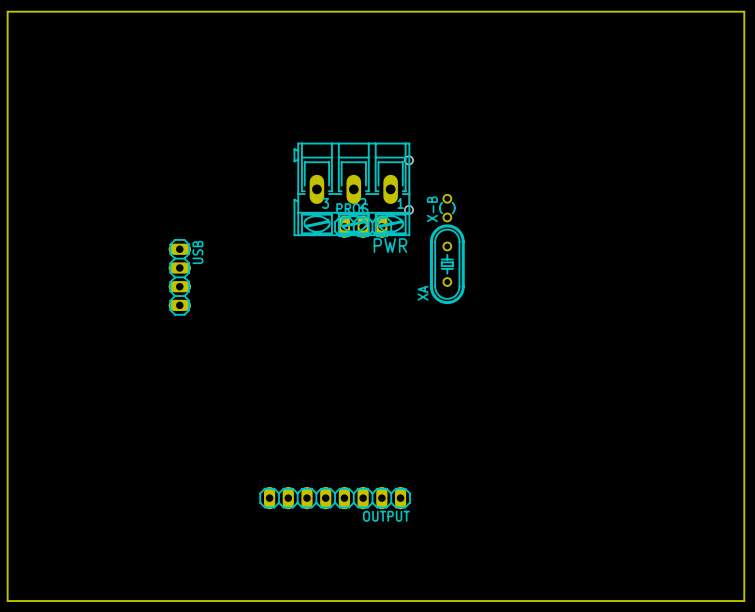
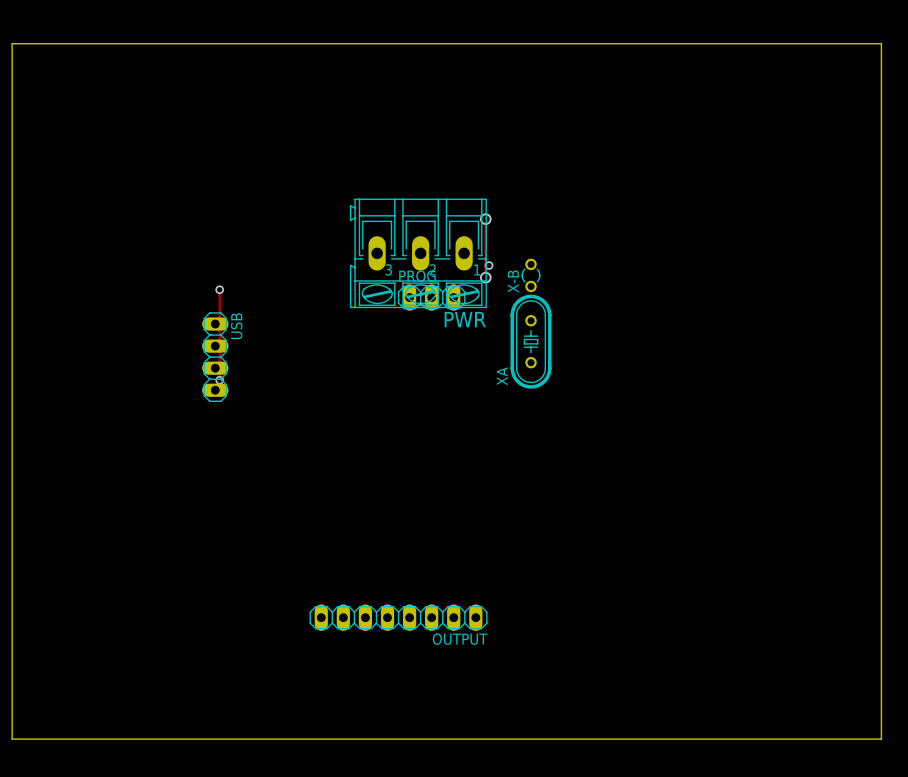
via: none -> (489, 265)
track: none -> (219, 289) (219, 380)
via: none -> (219, 289)
via: none -> (219, 380)

